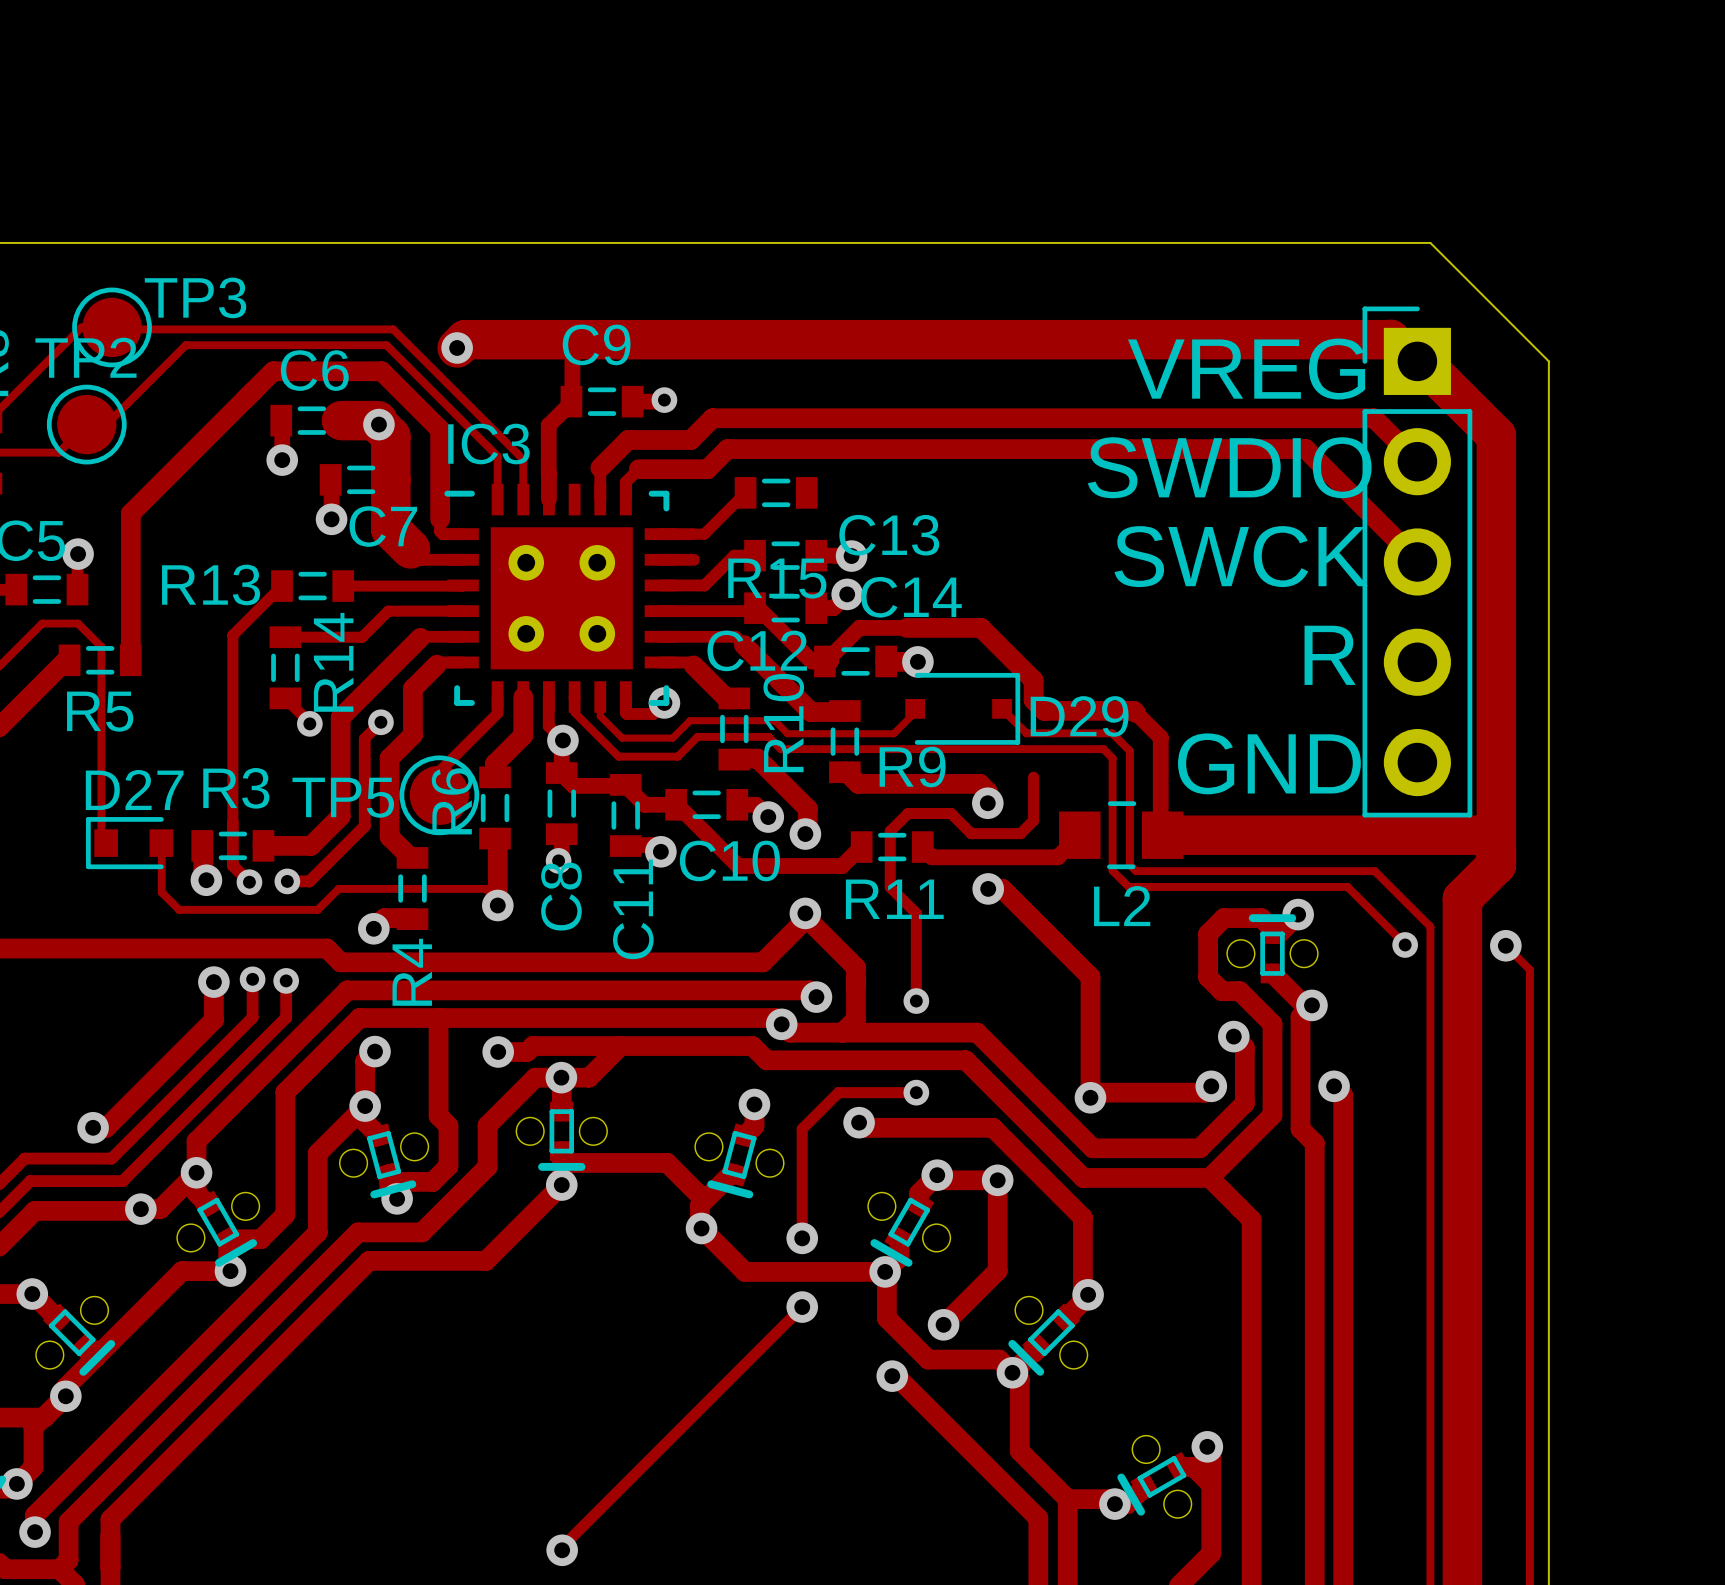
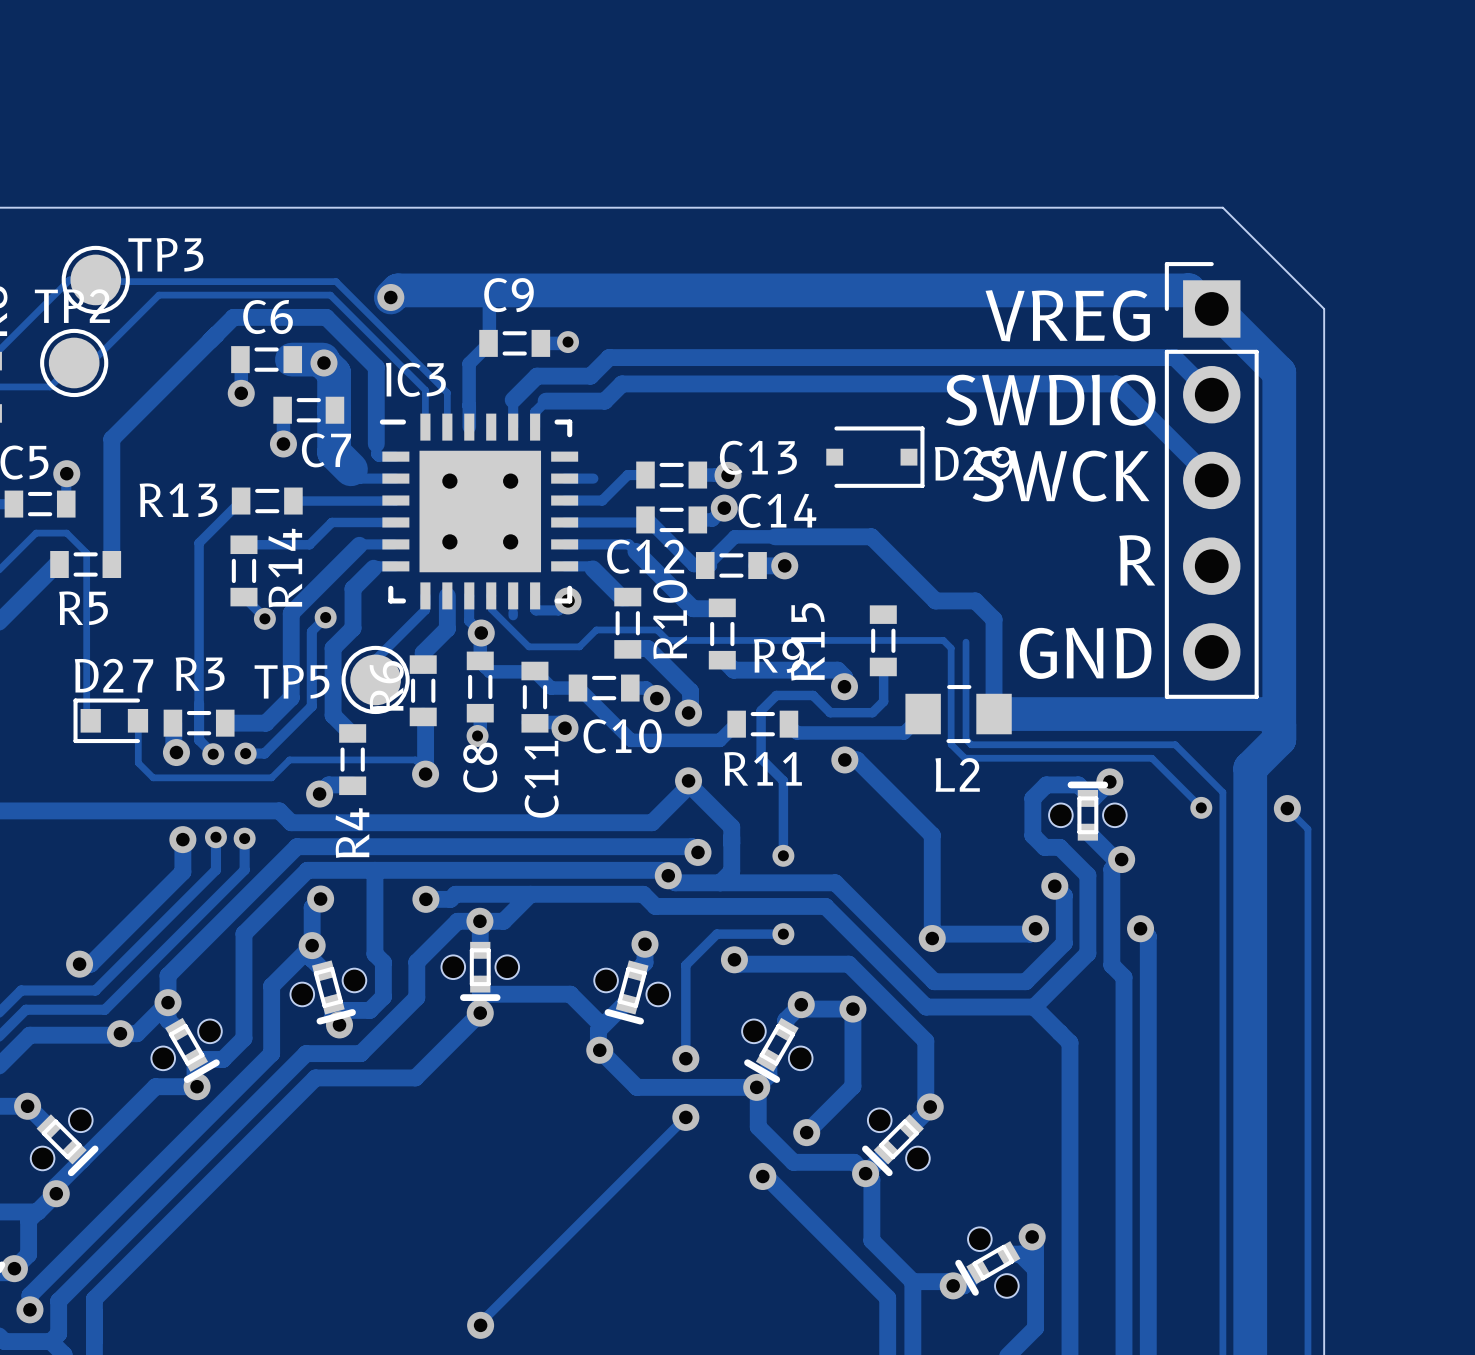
track: (745, 492) (704, 534) (660, 534) -> none
R15 rotation: 0° (776, 492) -> 90° clockwise (883, 640)
R15 position: (776, 492) -> (883, 640)
track: (981, 627) (1033, 680) (1033, 700) (1044, 710) (1133, 710) (1160, 737) (1160, 833) -> (838, 536) (871, 536) (935, 600) (975, 600) (994, 619) (994, 714)
D29 position: (962, 708) -> (875, 457)
track: (1002, 708) (1026, 733) (1112, 733) (1129, 751) -> none
track: (915, 714) (915, 708) (915, 712) (893, 733) (787, 733) (774, 720) (690, 720) (672, 738) (622, 738) (600, 716) -> (513, 615) (513, 612)

